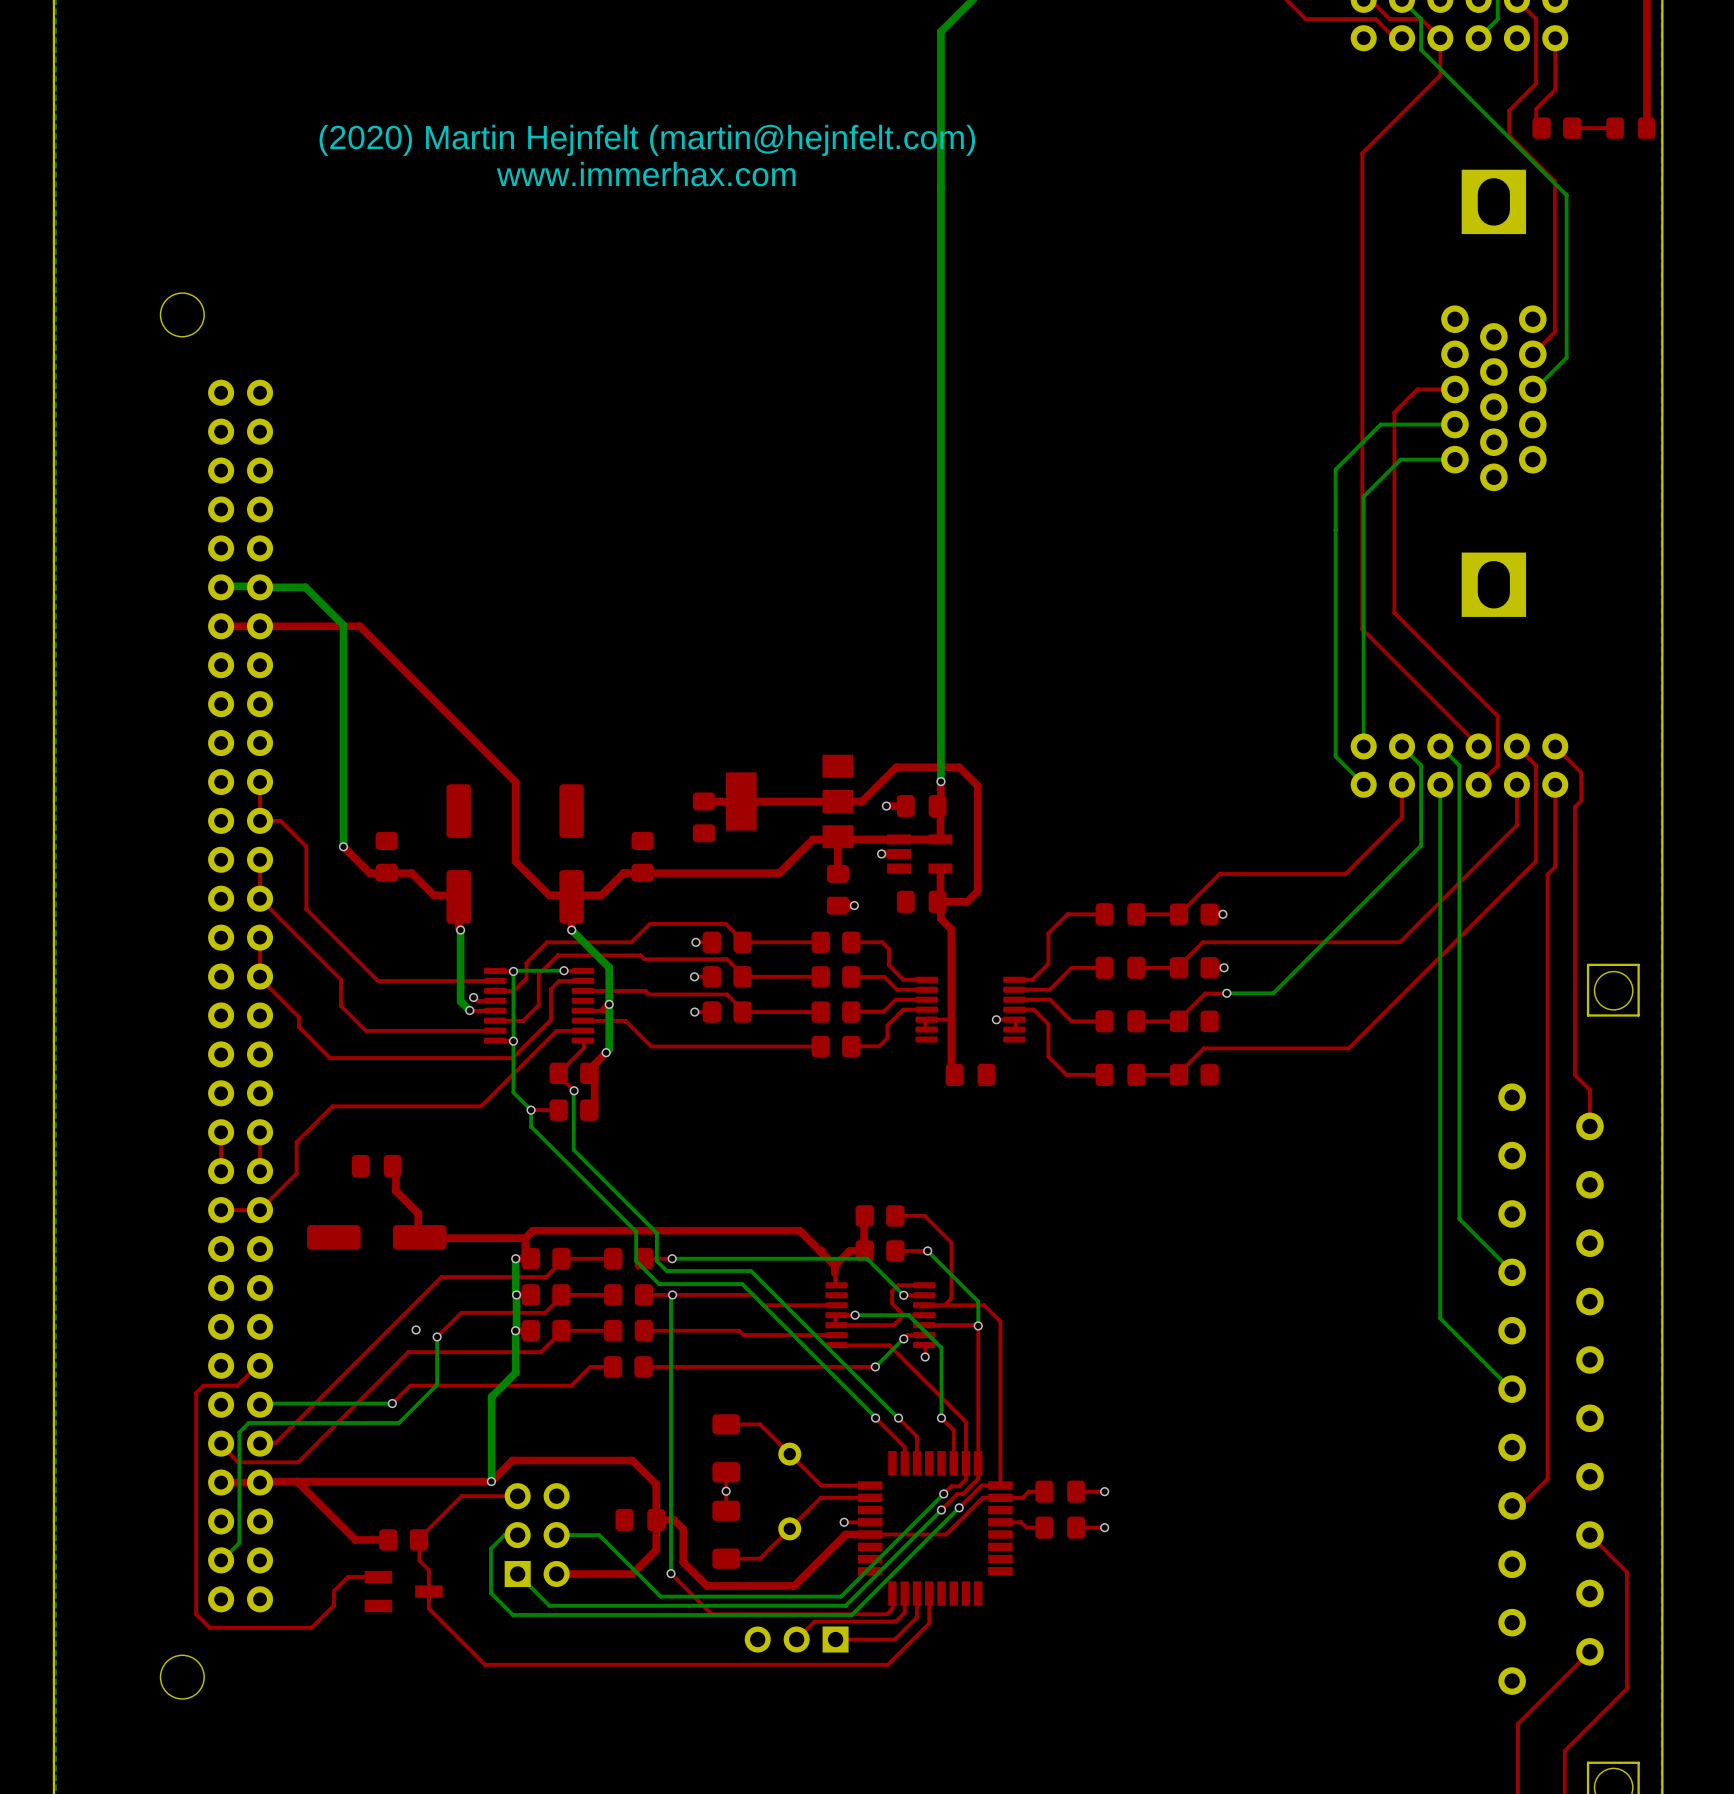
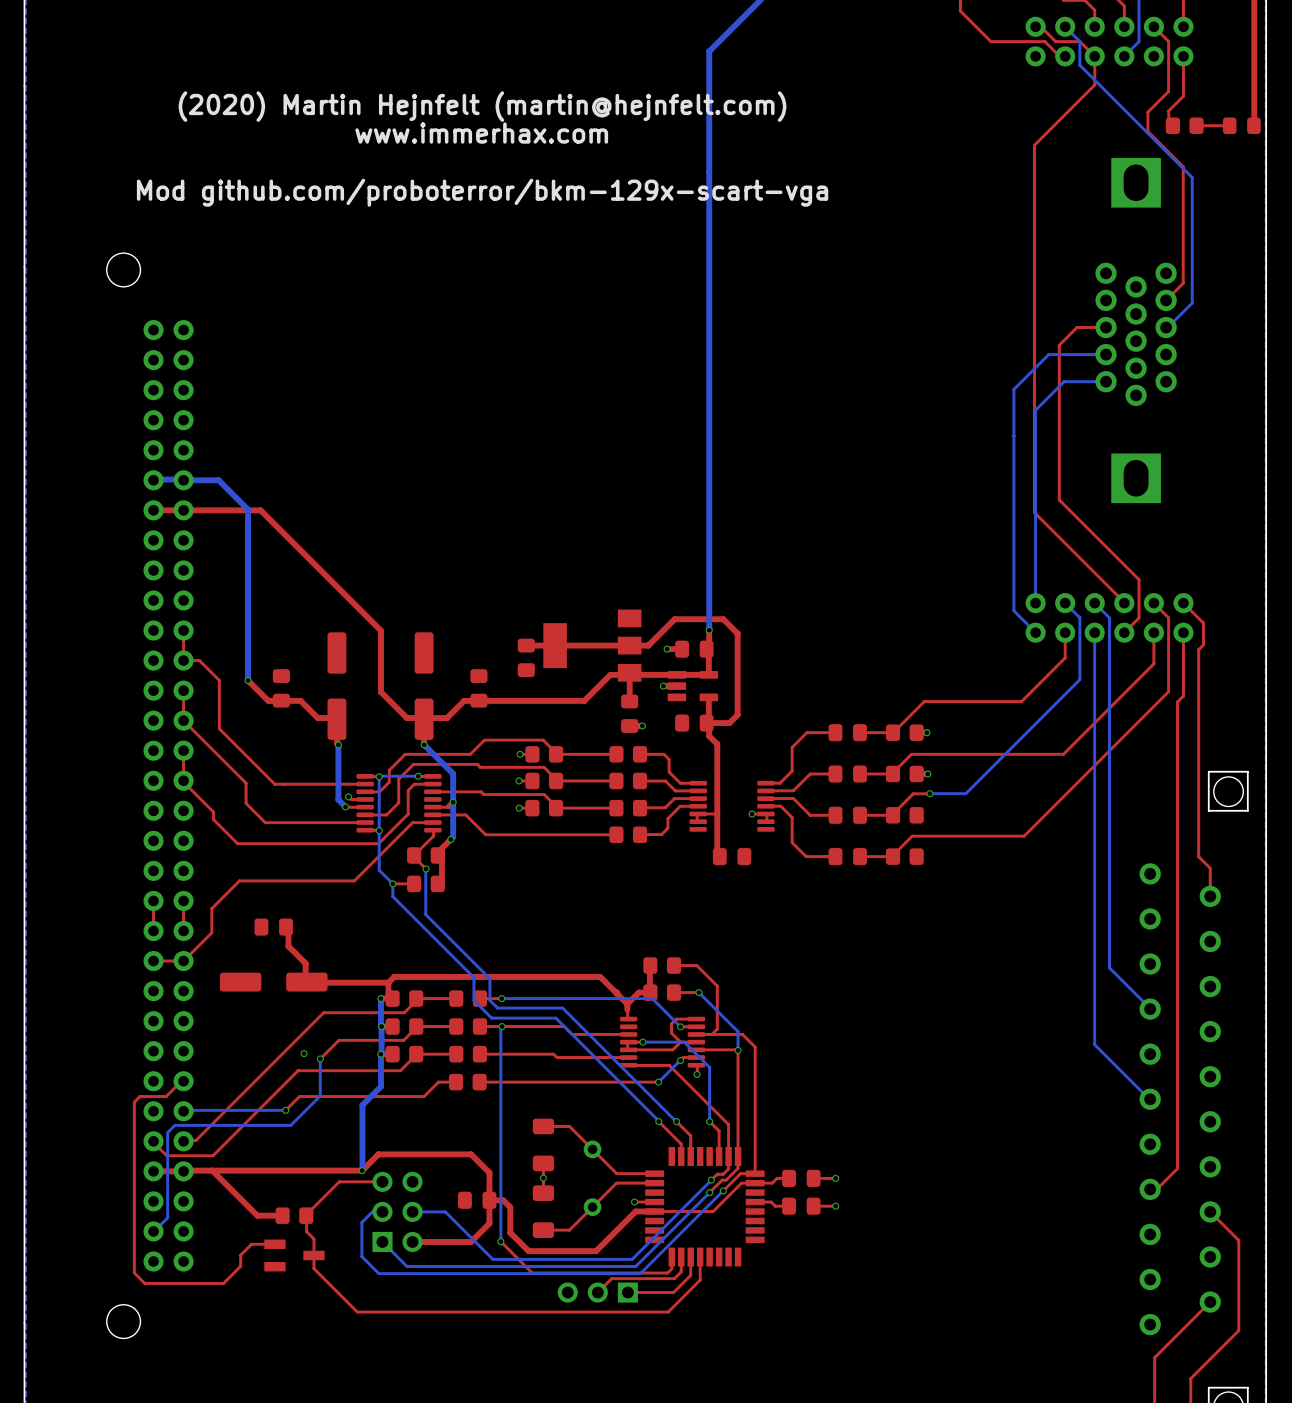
text: none -> (2020) Martin Hejnfelt (martin@hejnfelt.com) (482, 106)
text: (2020) Martin Hejnfelt (martin@hejnfelt.com) (647, 140) -> www.immerhax.com (481, 133)
text: www.immerhax.com (646, 174) -> none
text: none -> Mod github.com/proboterror/bkm-129x-scart-vga (482, 192)

